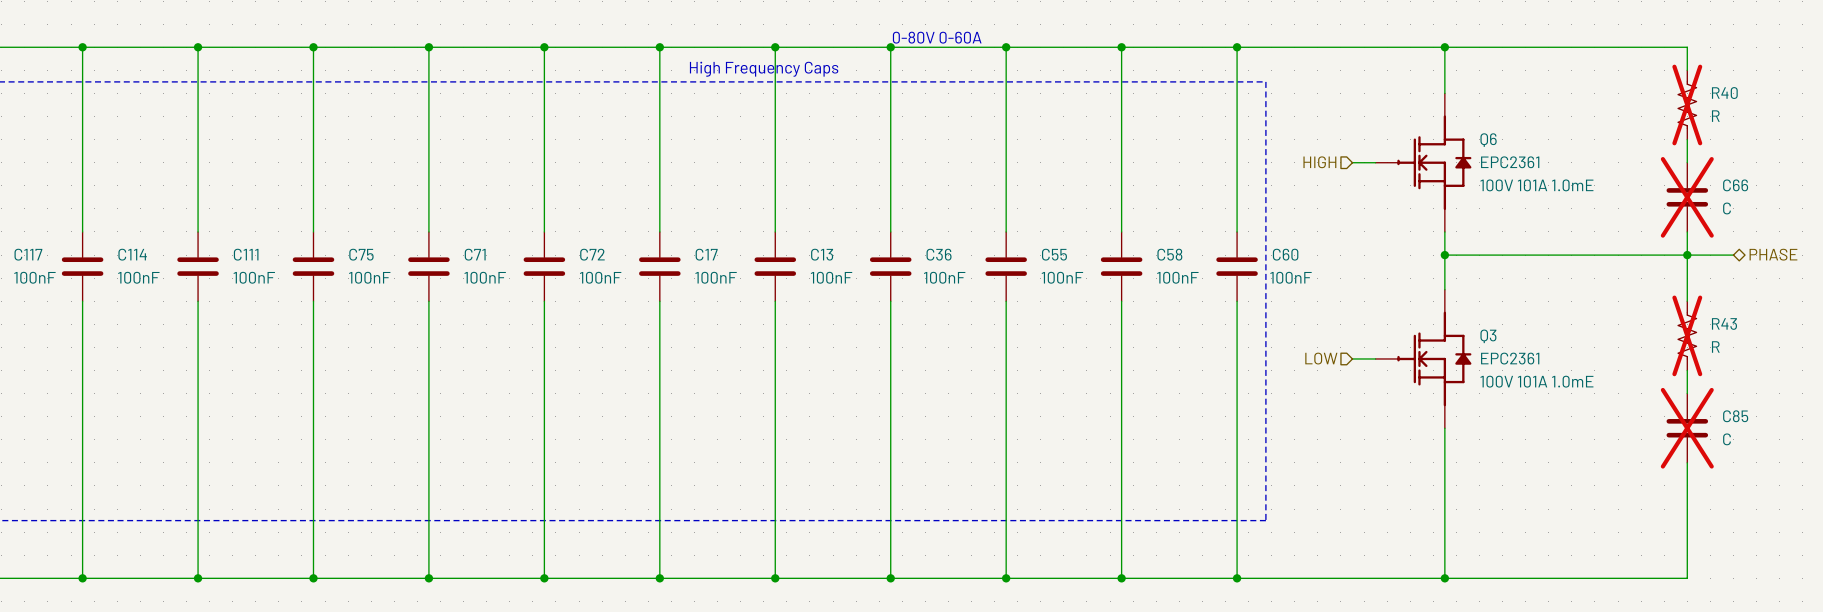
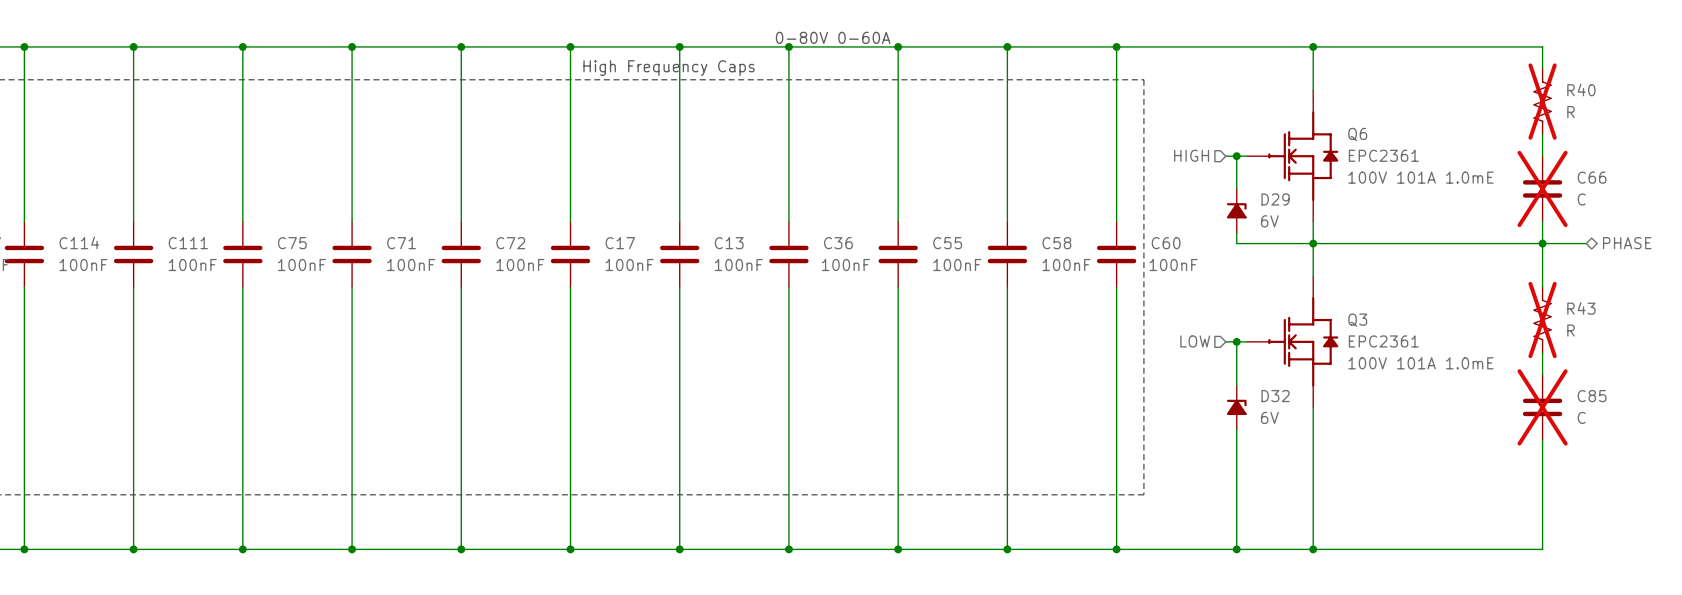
wire: none -> (1236, 156) (1236, 188)
junction: none -> (1236, 156)
D29: none -> 6V (1236, 210)
wire: none -> (1236, 232) (1236, 243) (1313, 243)
wire: none -> (1236, 341) (1236, 385)
junction: none -> (1236, 341)
D32: none -> 6V (1236, 407)
wire: none -> (1236, 429) (1236, 549)
junction: none -> (1236, 549)

